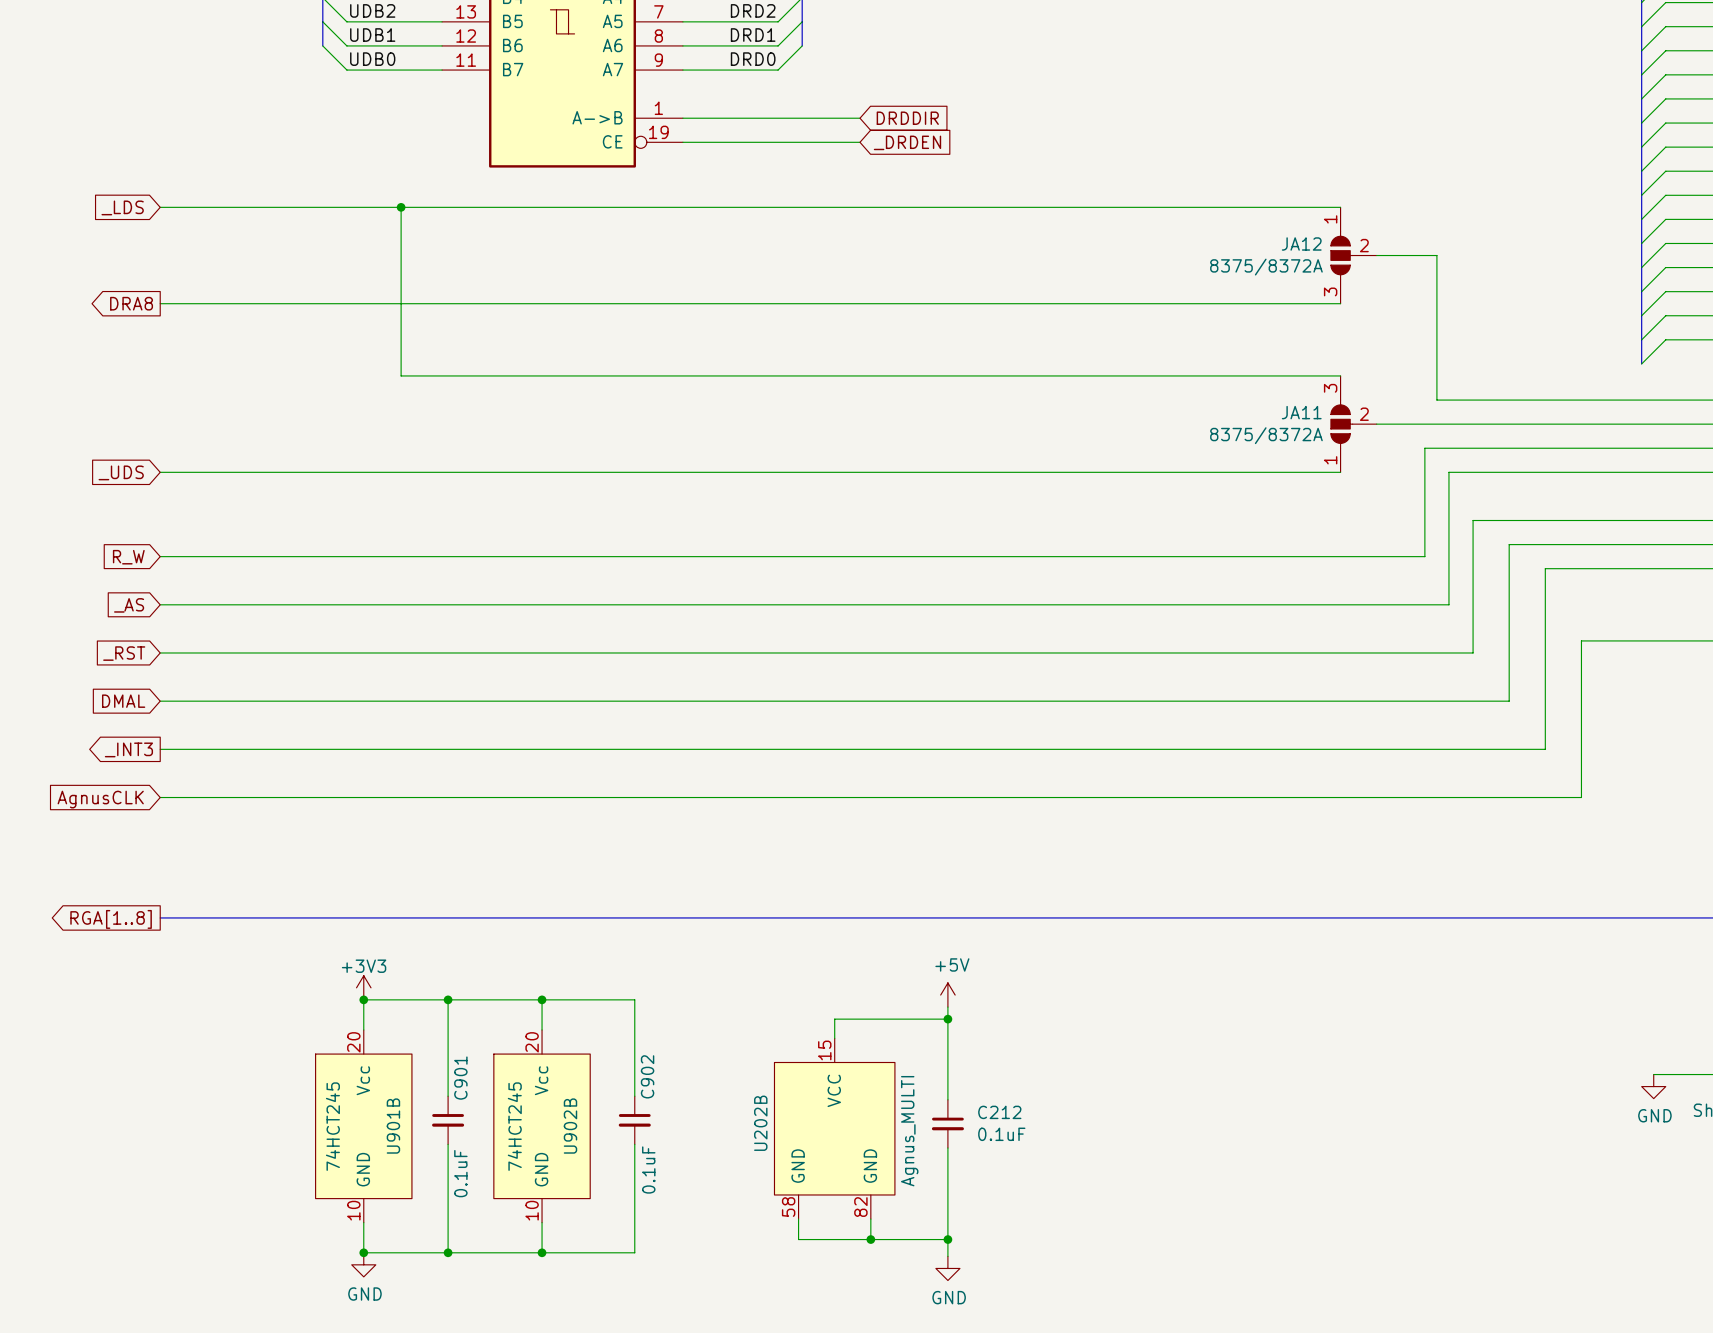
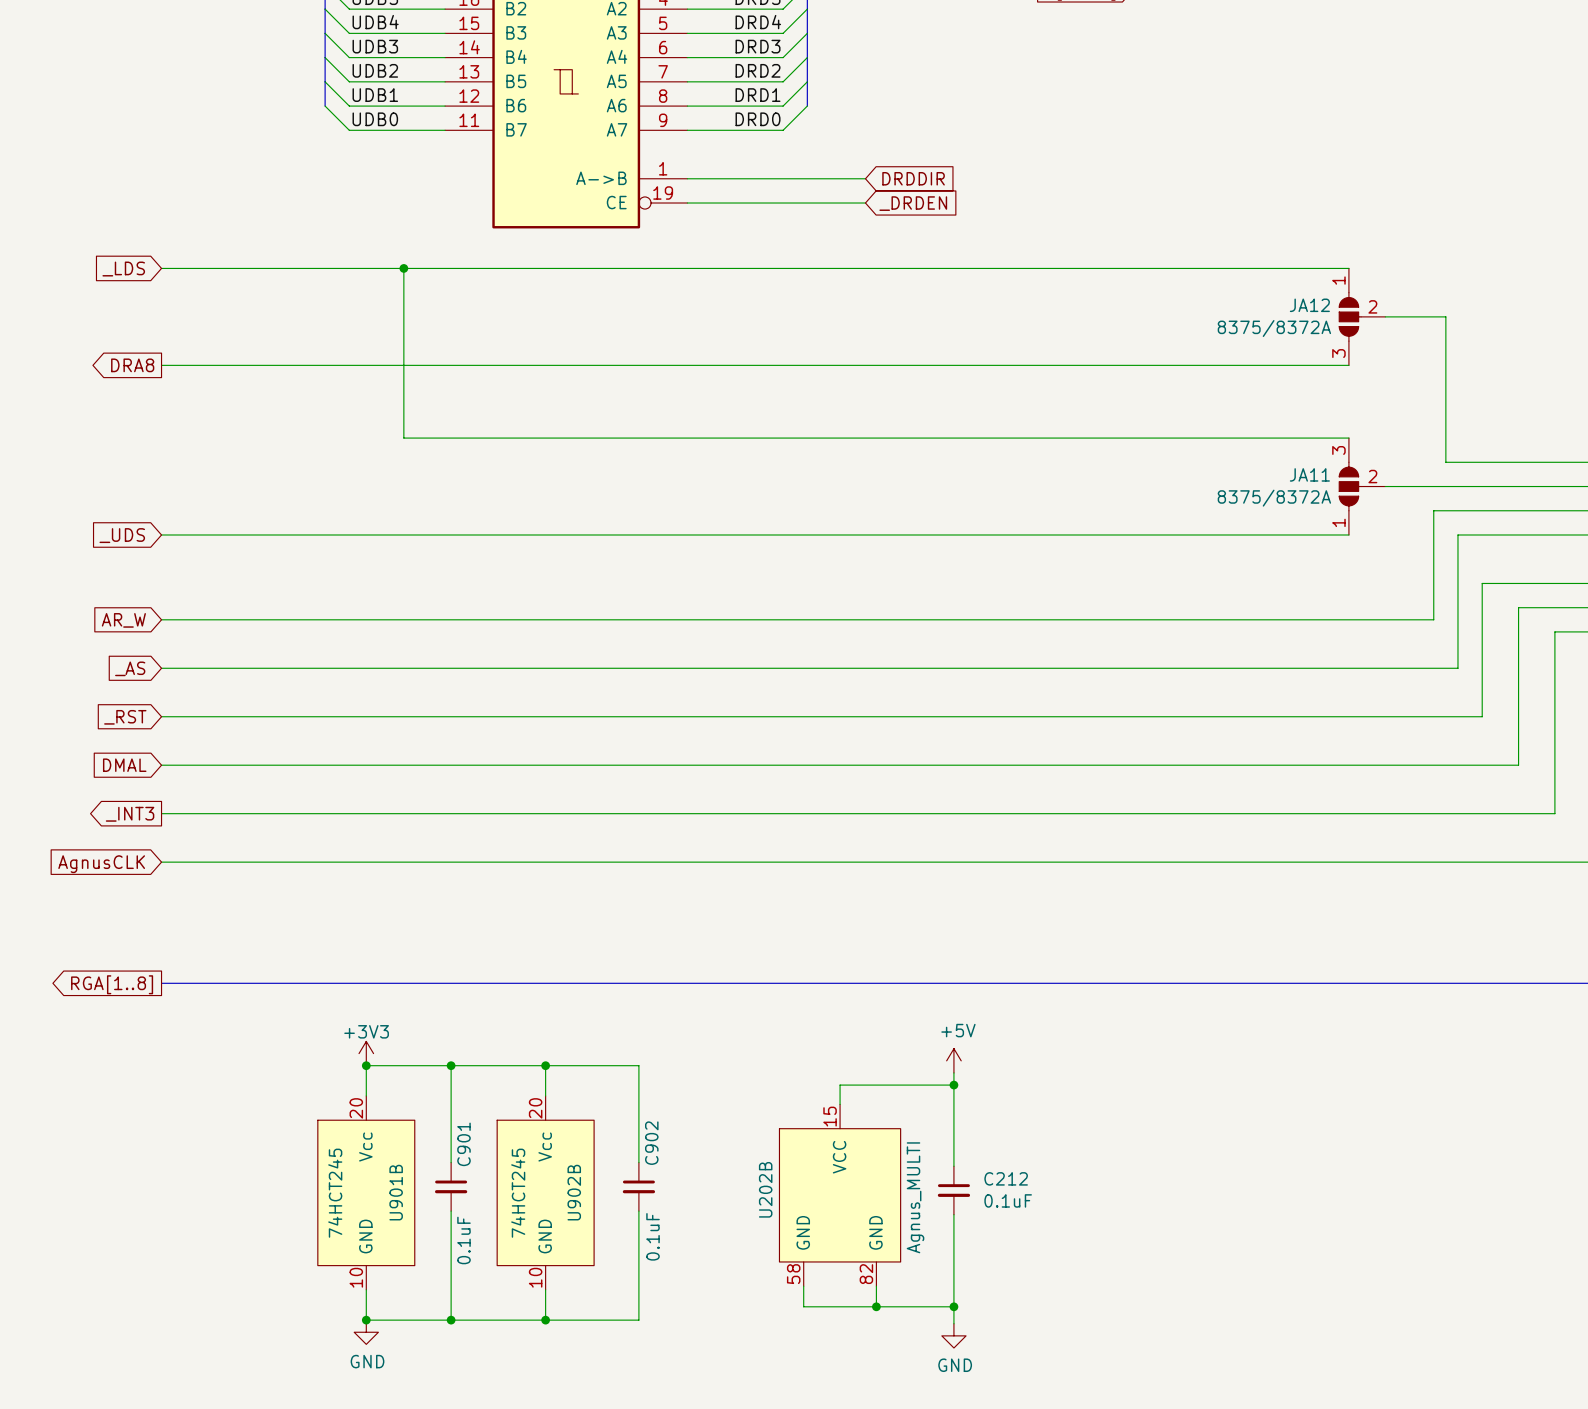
global label: R_W (128, 557) -> AR_W (123, 620)

